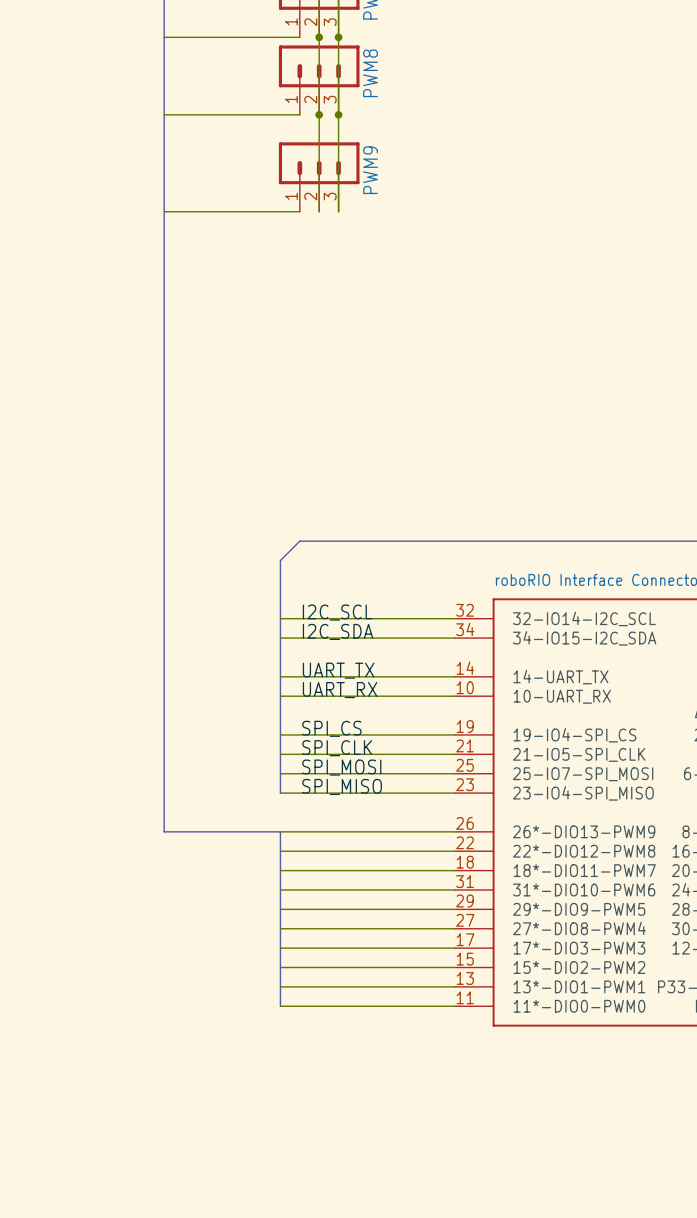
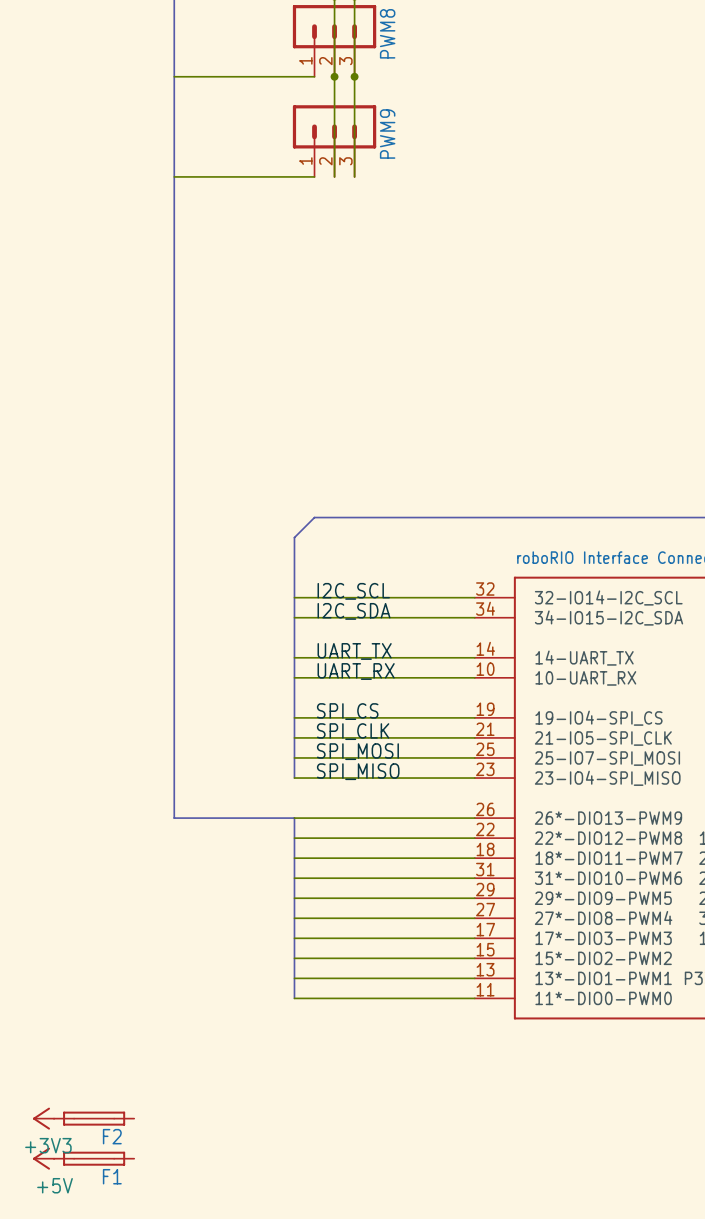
power symbol: none -> +3V3 (43, 1118)
F2: none -> (94, 1118)
power symbol: none -> +5V (43, 1158)
F1: none -> (94, 1158)

